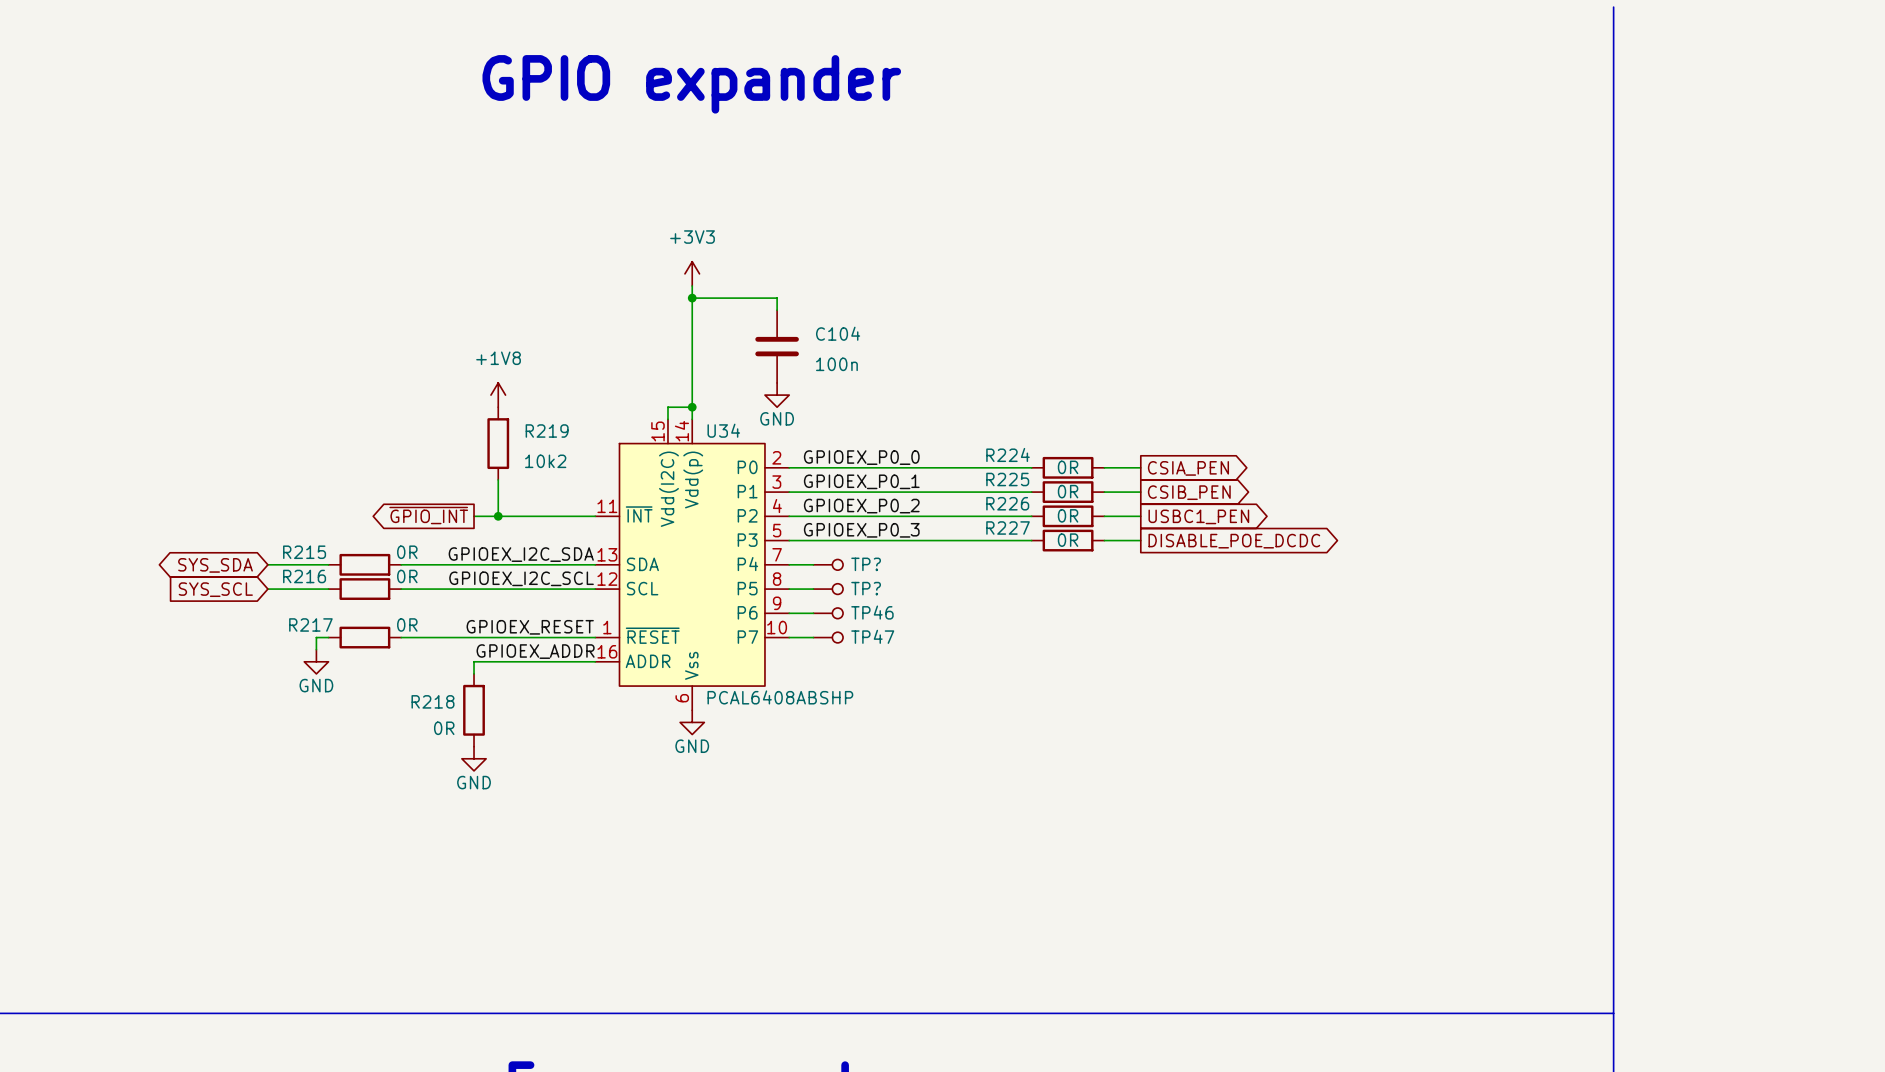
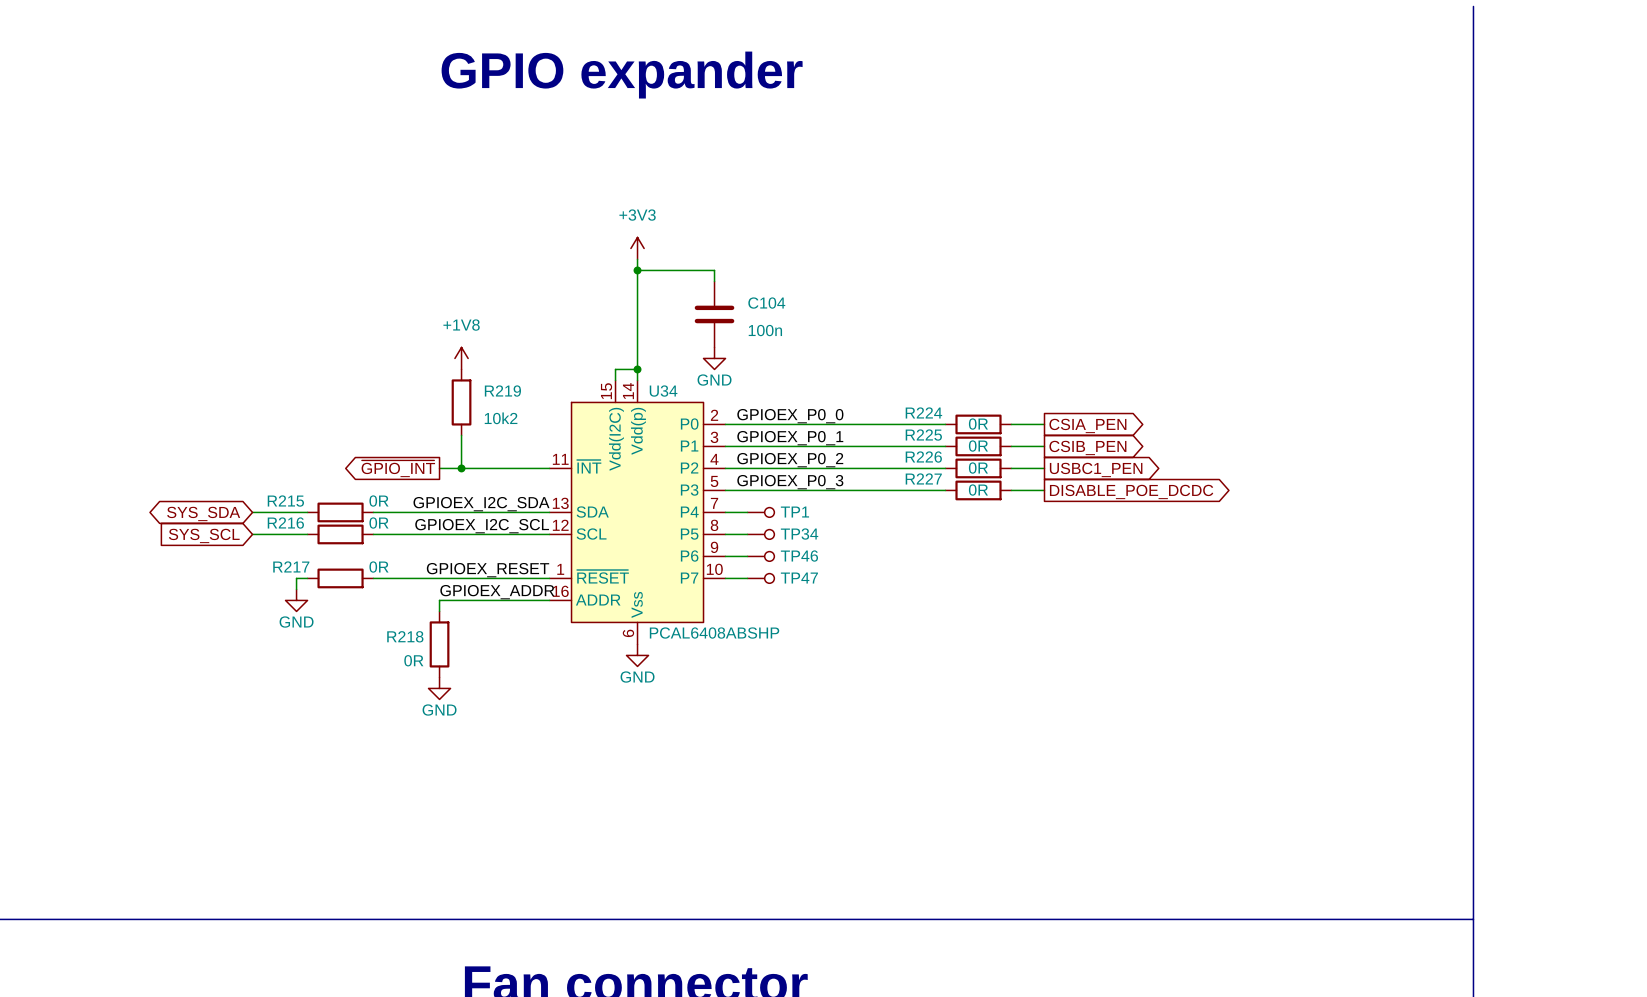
TP? name: TP? (866, 564) -> TP1 (794, 512)
TP? name: TP? (866, 588) -> TP34 (799, 534)

